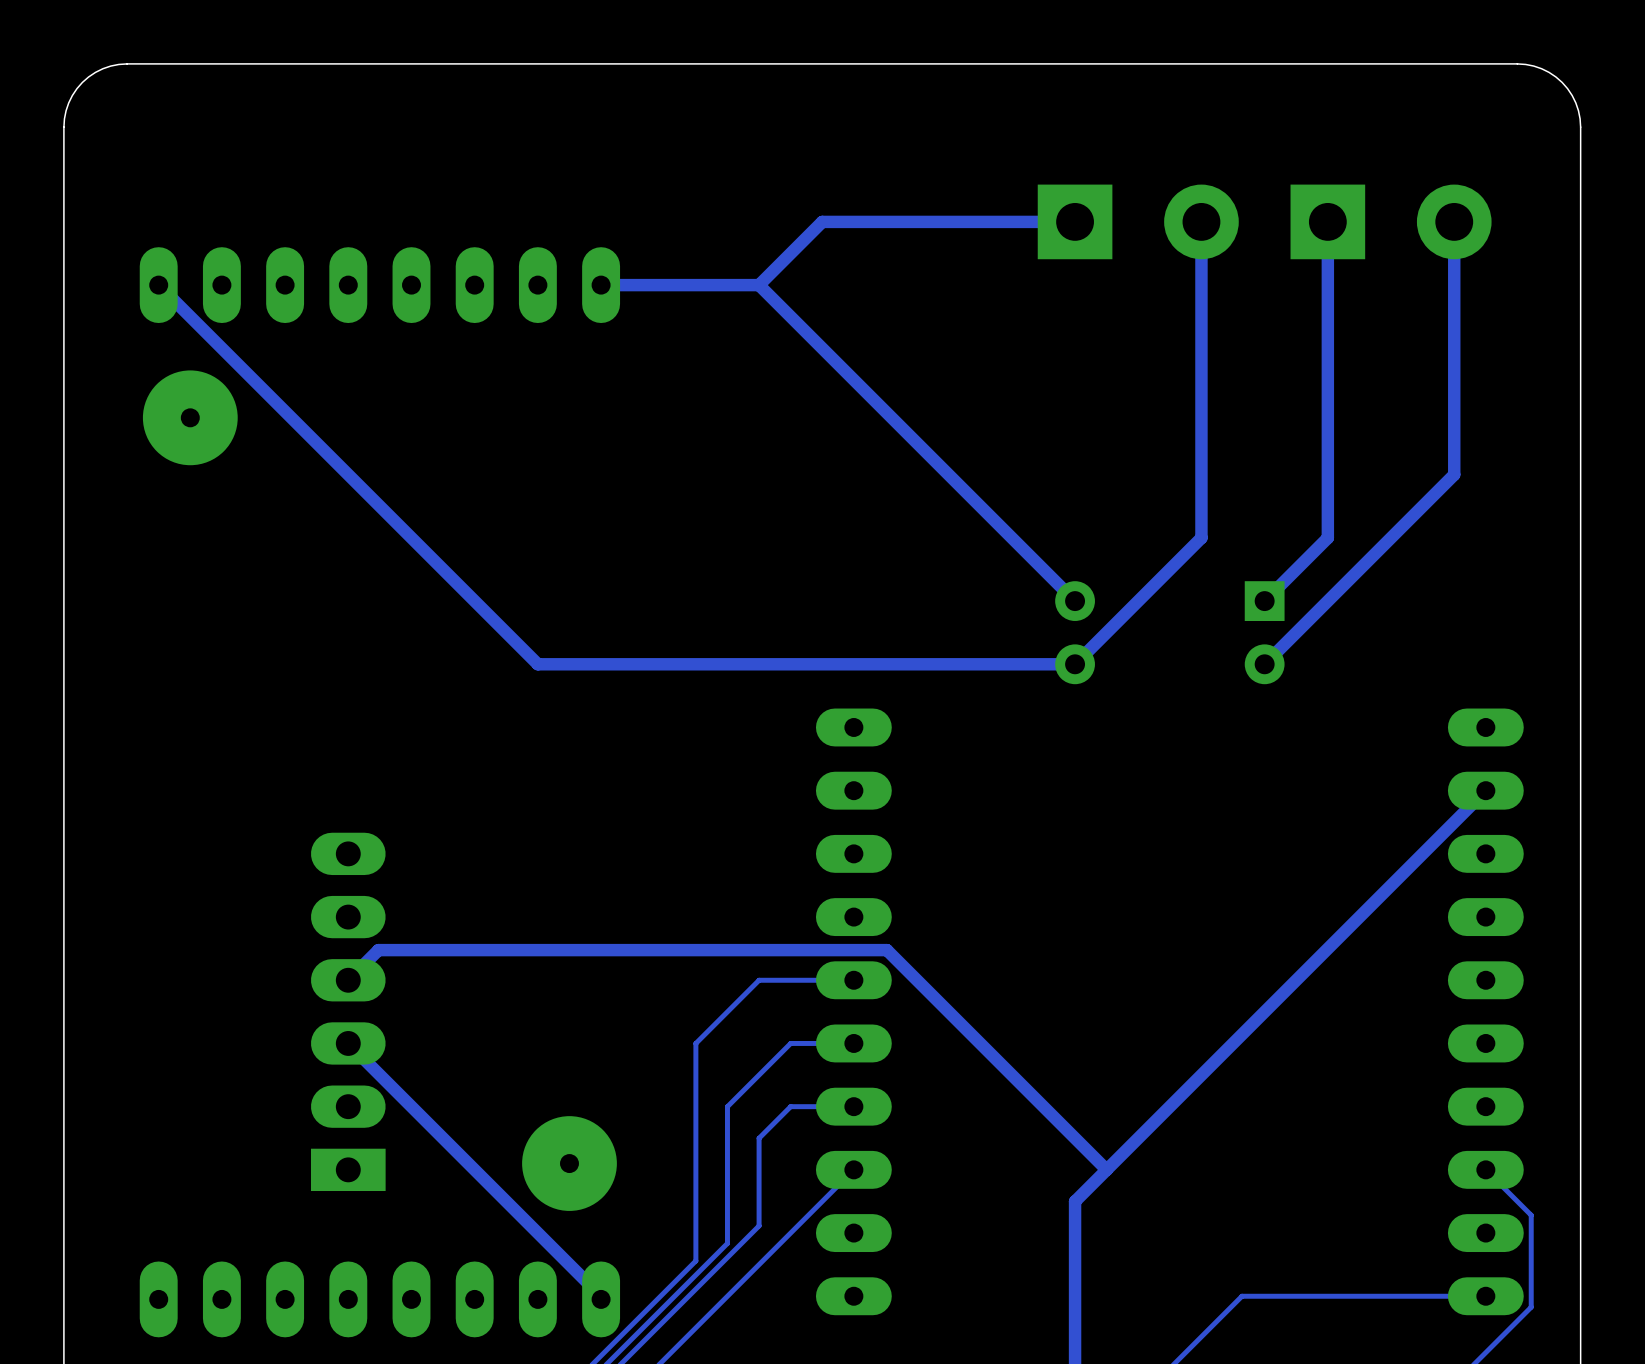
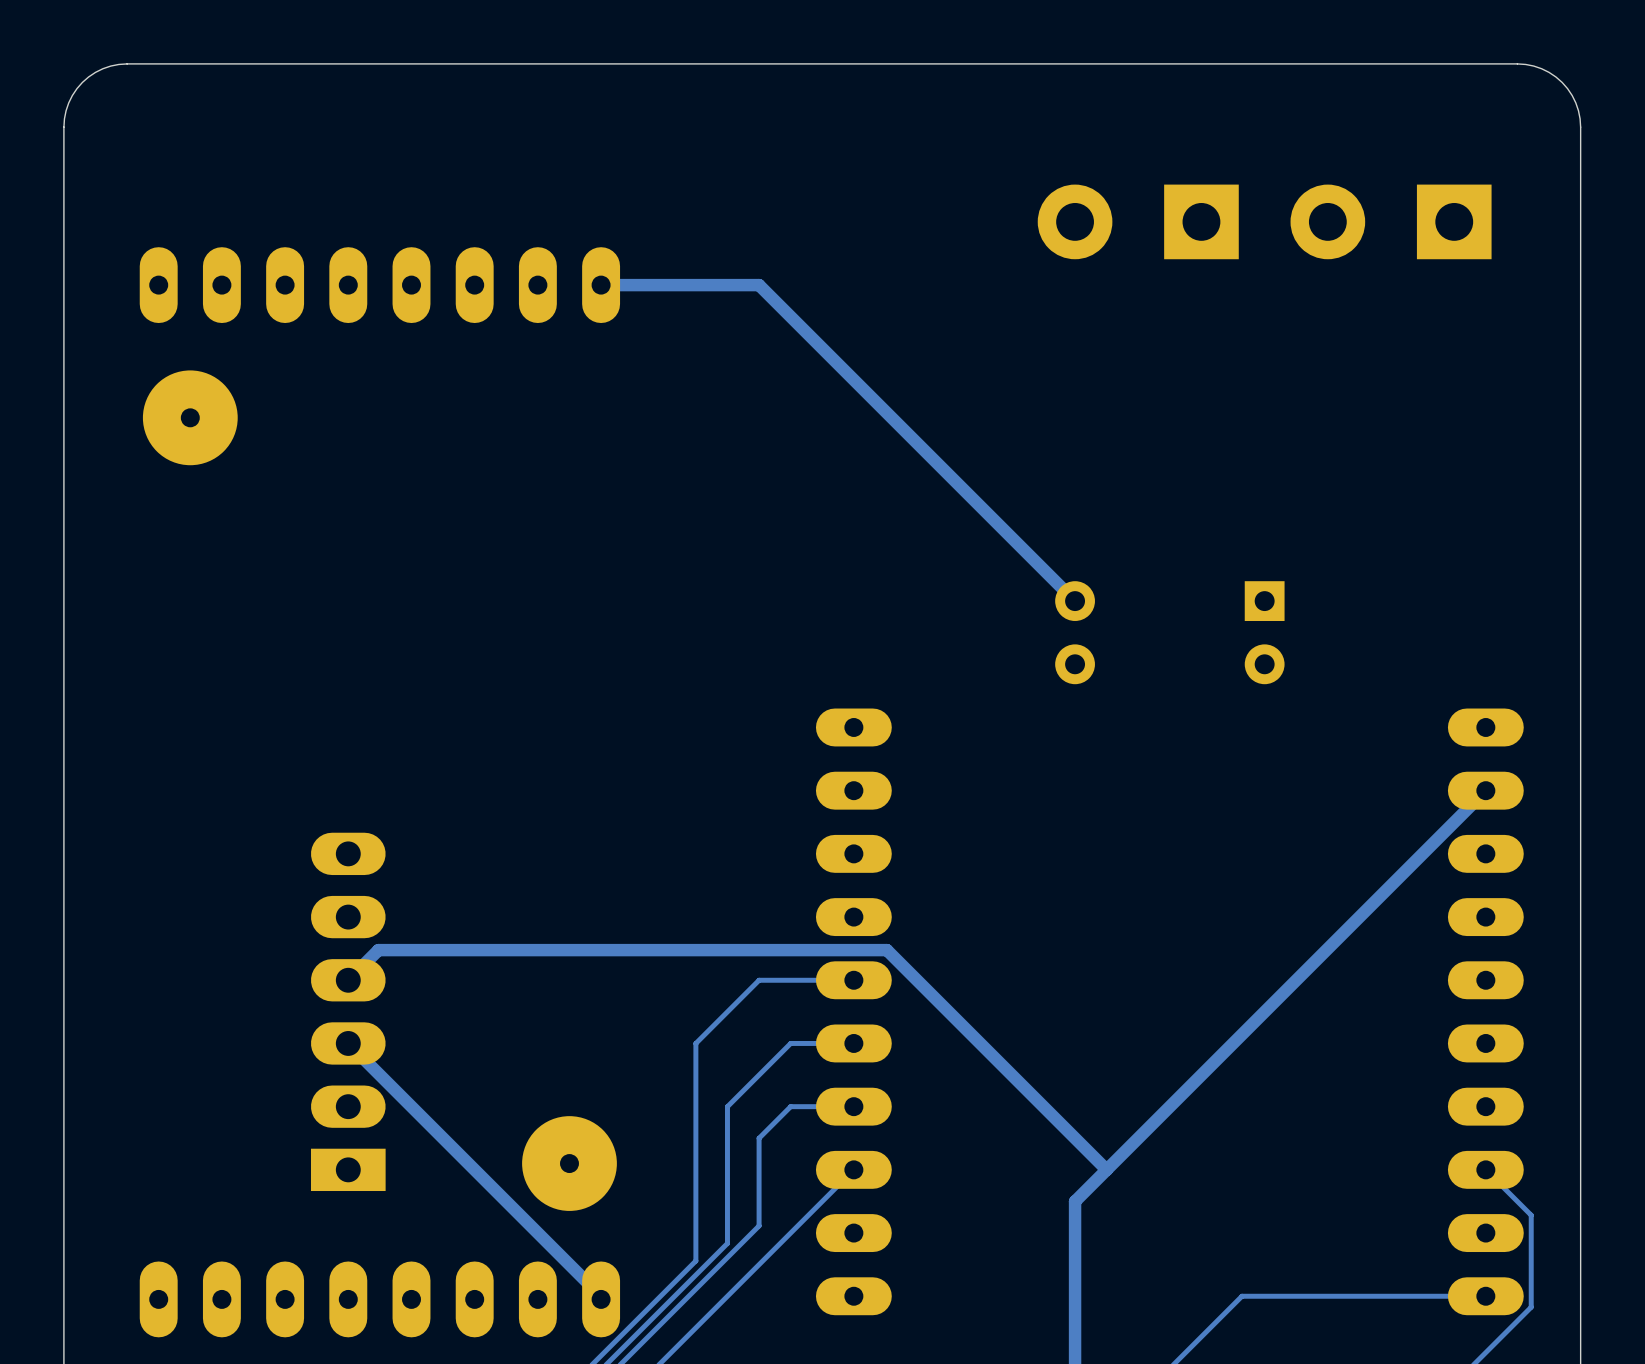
track: (1075, 221) (822, 221) (759, 285) -> none
part rotation: 0° (1138, 221) -> 180° (1138, 221)
track: (1201, 221) (1201, 537) (1075, 664) (537, 664) (158, 285) -> none
track: (1327, 221) (1327, 537) (1264, 601) -> none
part rotation: 0° (1391, 221) -> 180° (1391, 221)
track: (1454, 221) (1454, 474) (1264, 664) -> none

